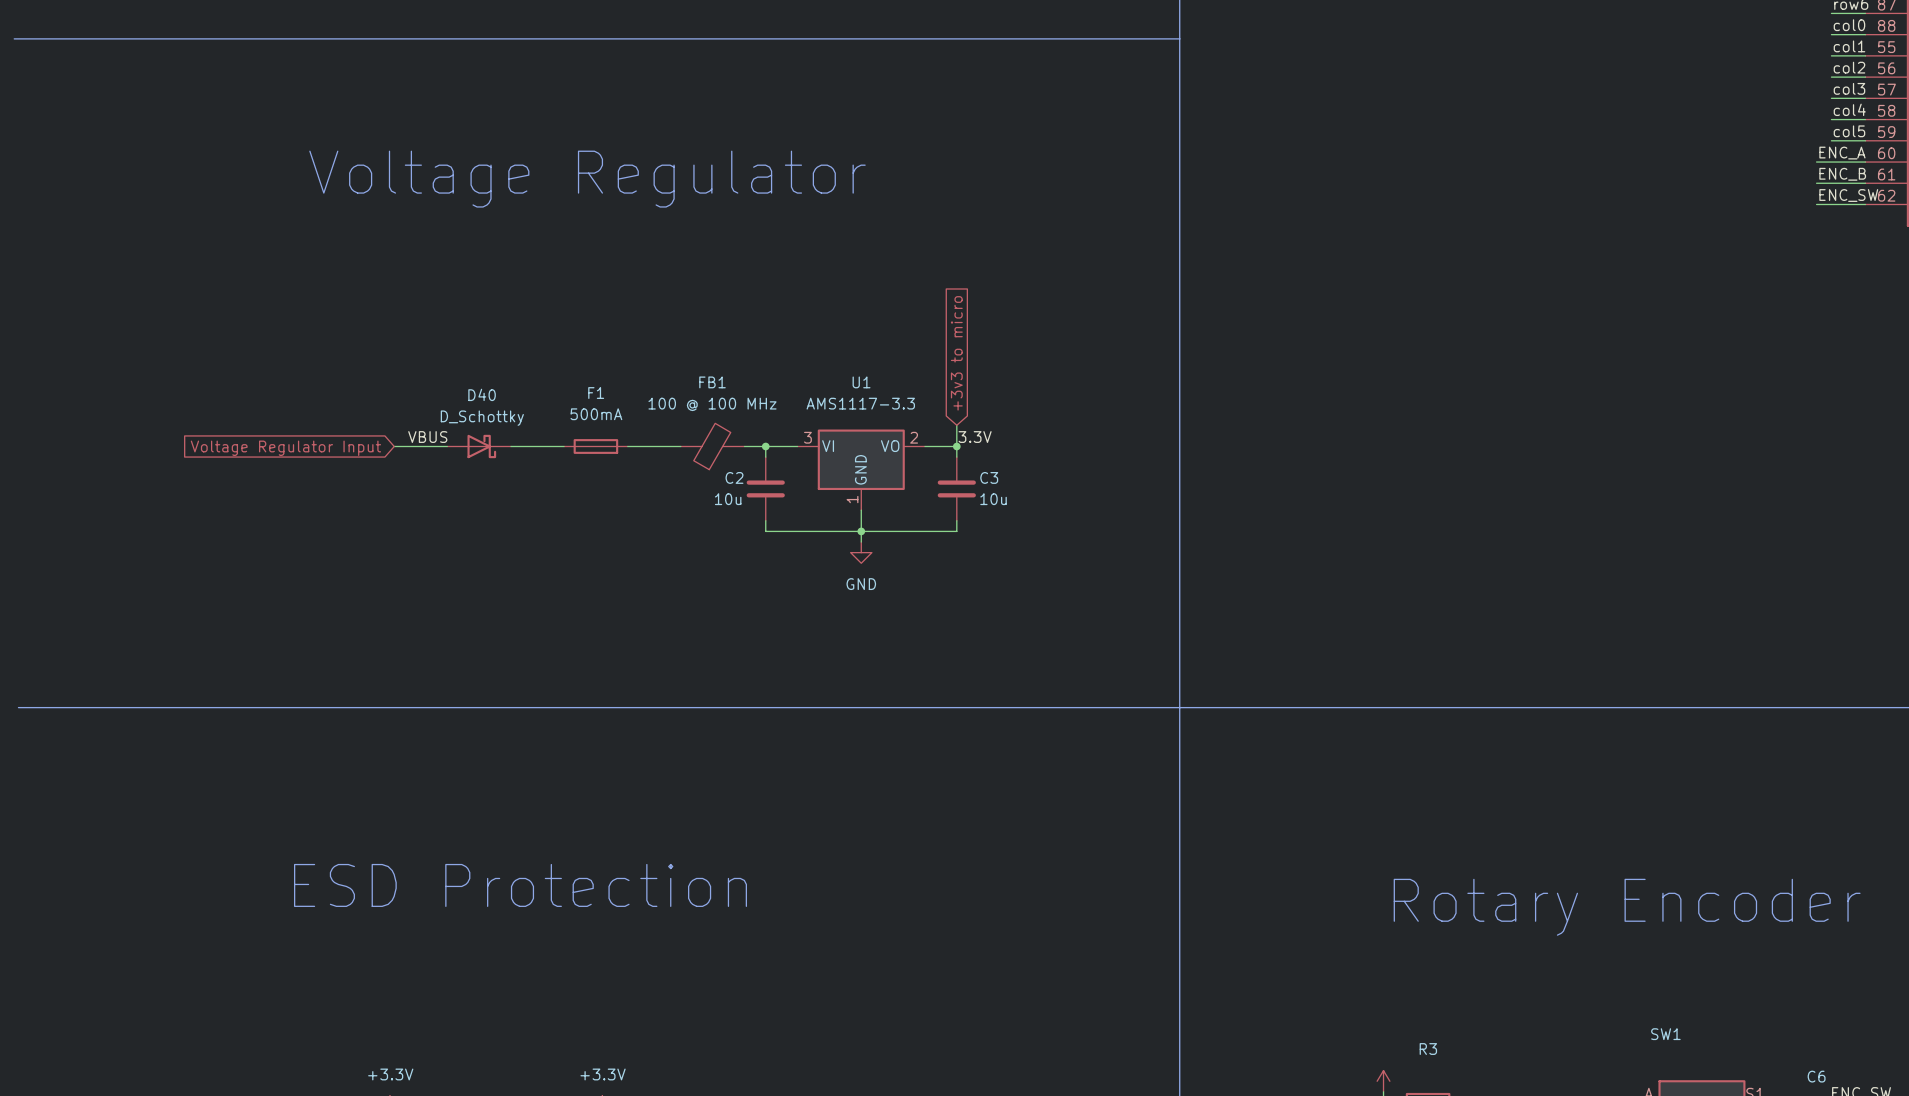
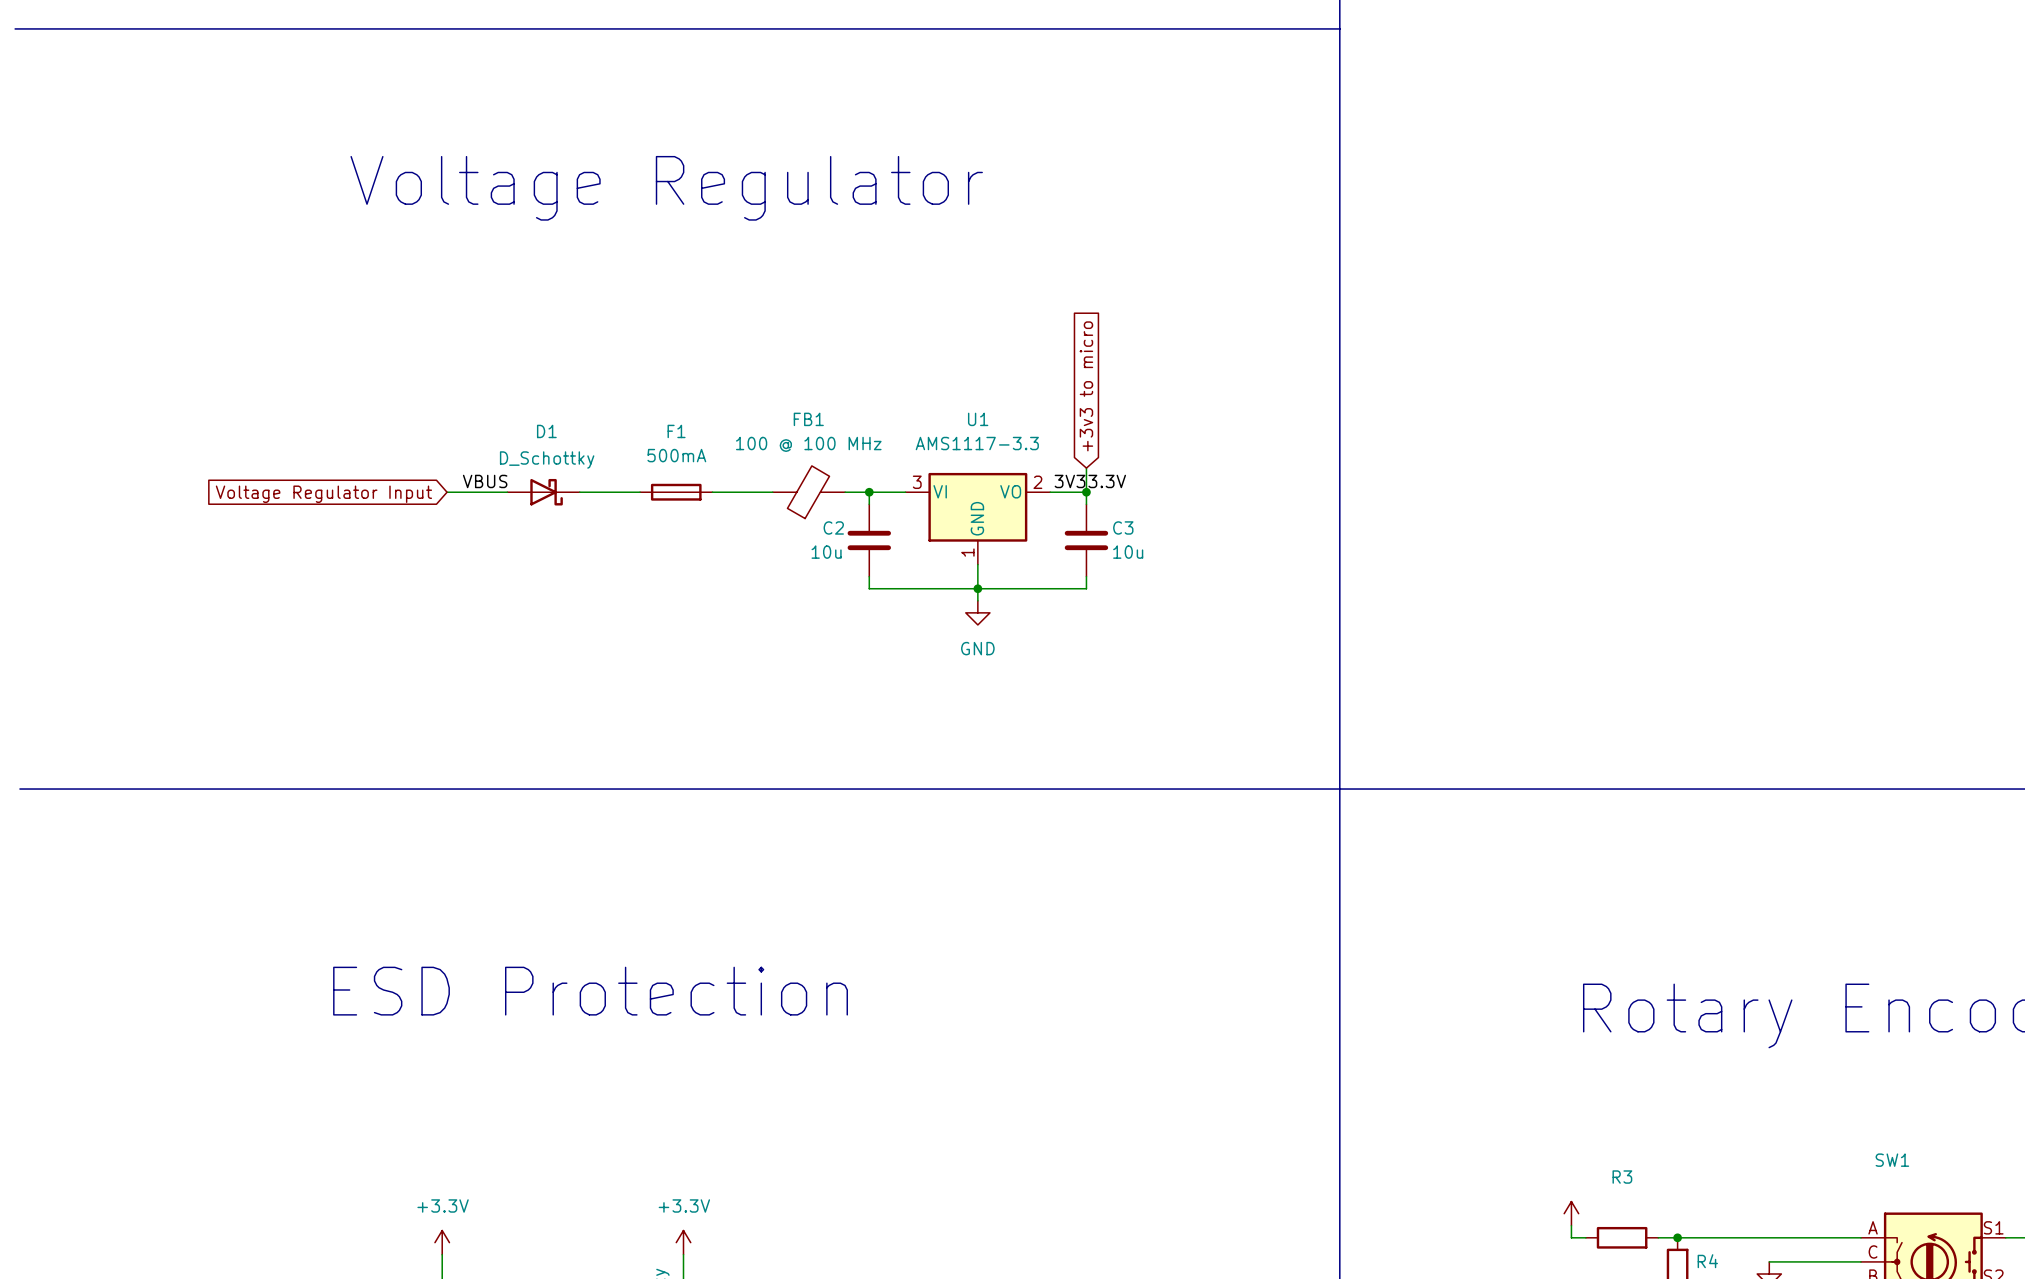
D40 name: D40 (482, 394) -> D1 (546, 431)
label: none -> 3V3 (1069, 481)

